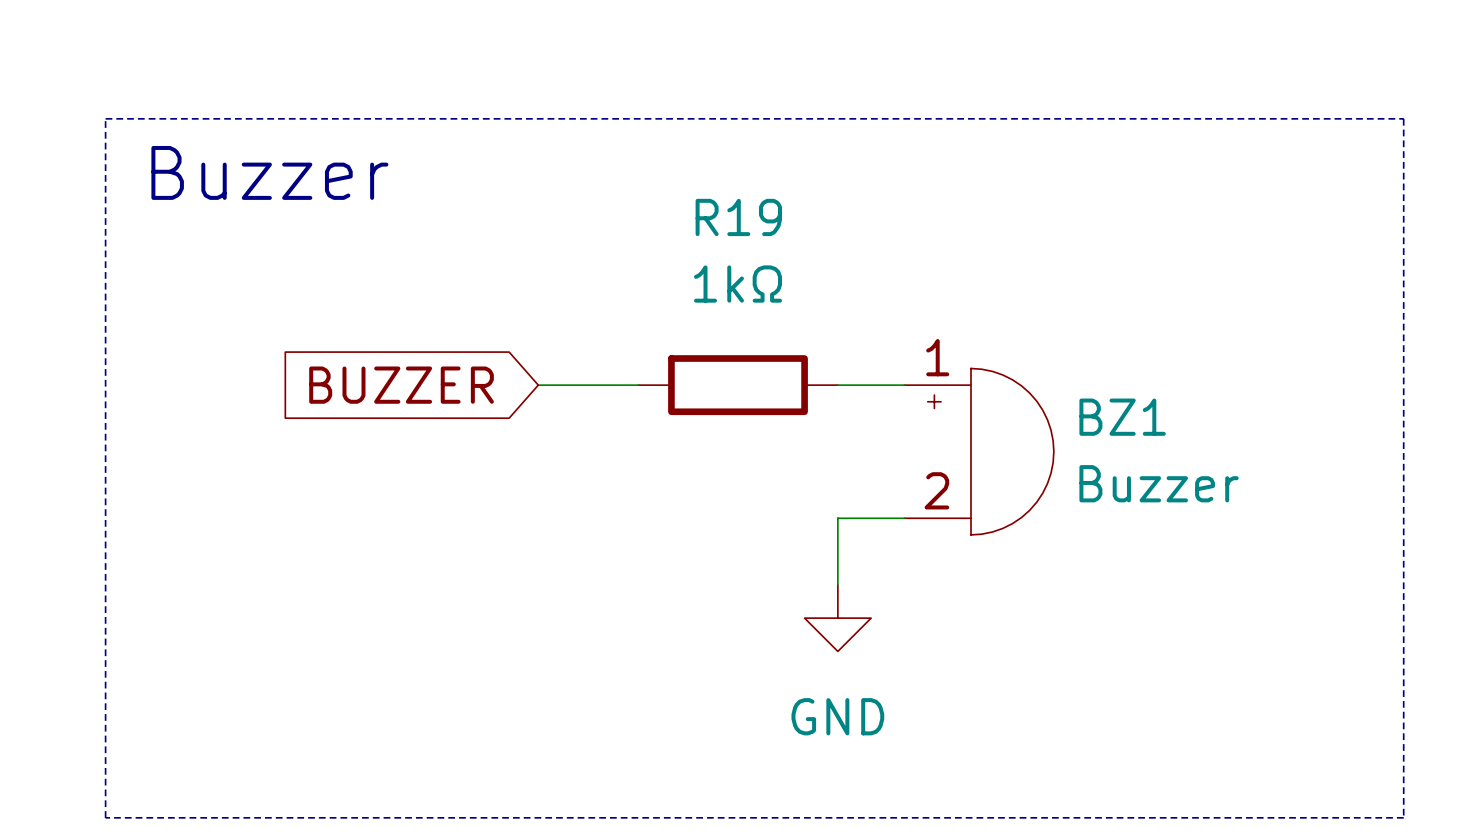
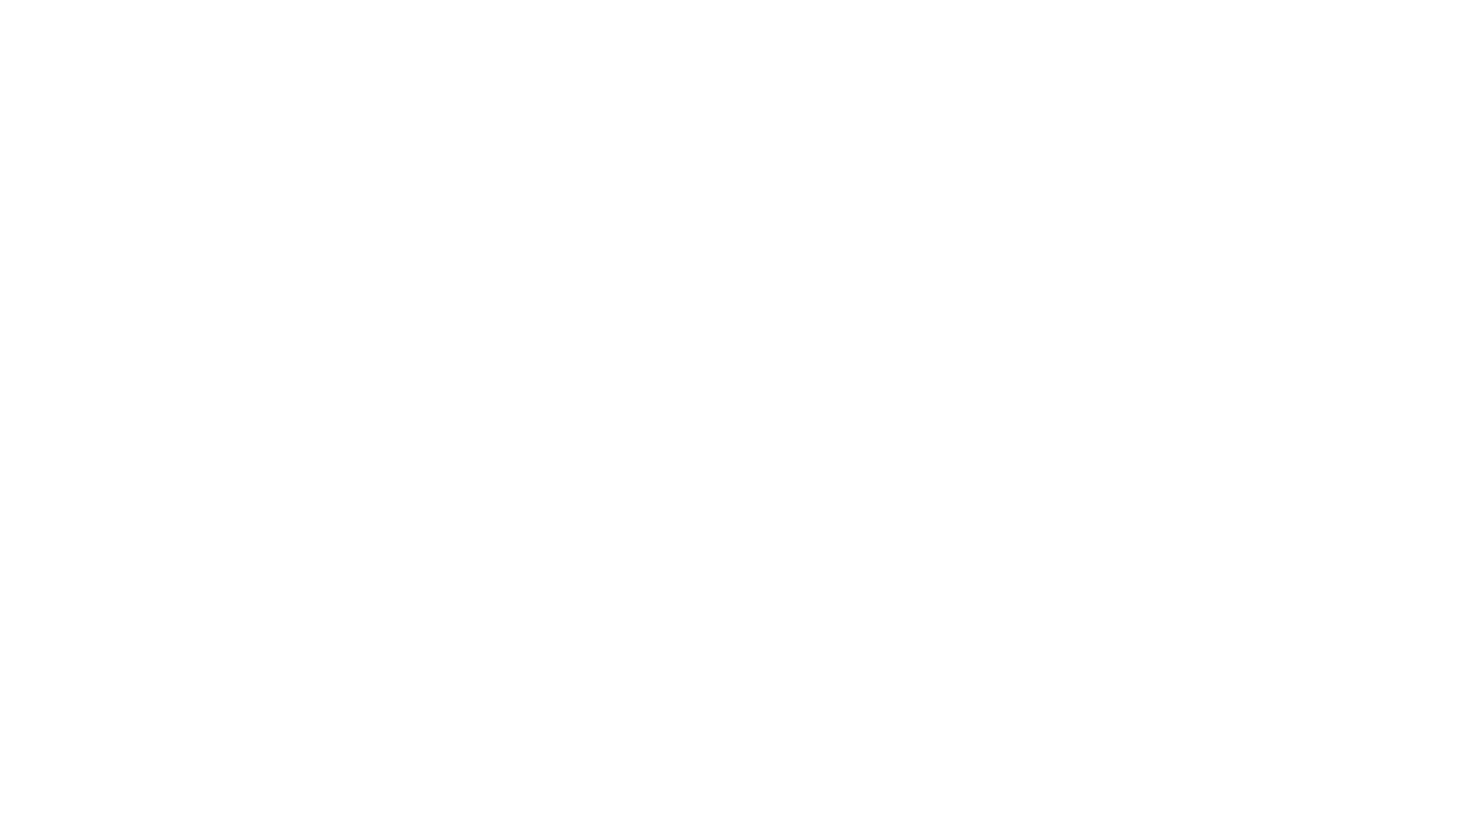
line: (105, 118) (1403, 118) (1403, 817) (105, 817) (105, 118) -> none
text: Buzzer (269, 172) -> none
global label: BUZZER (401, 385) -> none
wire: (538, 385) (638, 385) -> none
R19: 1kΩ (738, 385) -> none
wire: (837, 385) (904, 385) -> none
BZ1: Buzzer (979, 451) -> none
wire: (904, 518) (837, 518) (837, 584) -> none
power symbol: GND (837, 618) -> none

